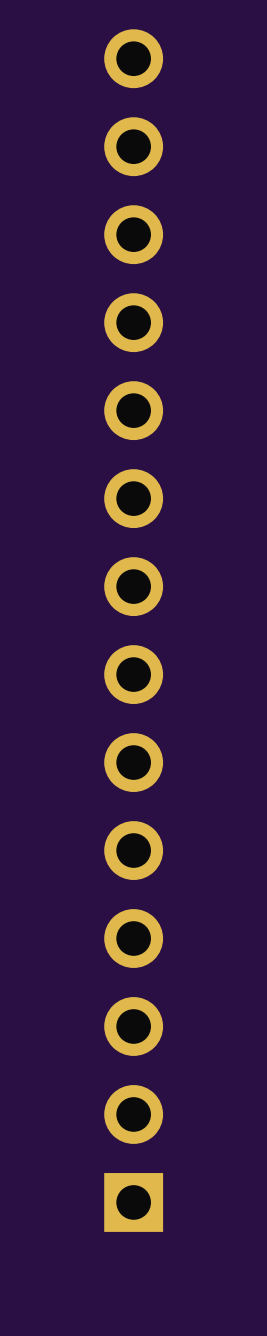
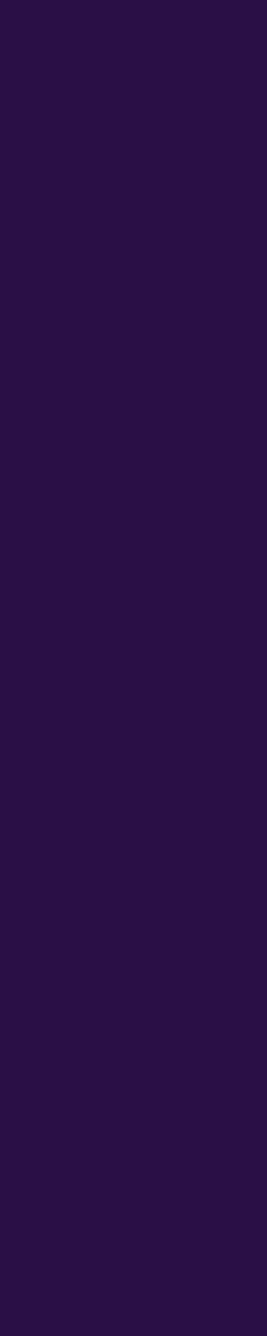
part: (133, 630) -> none

